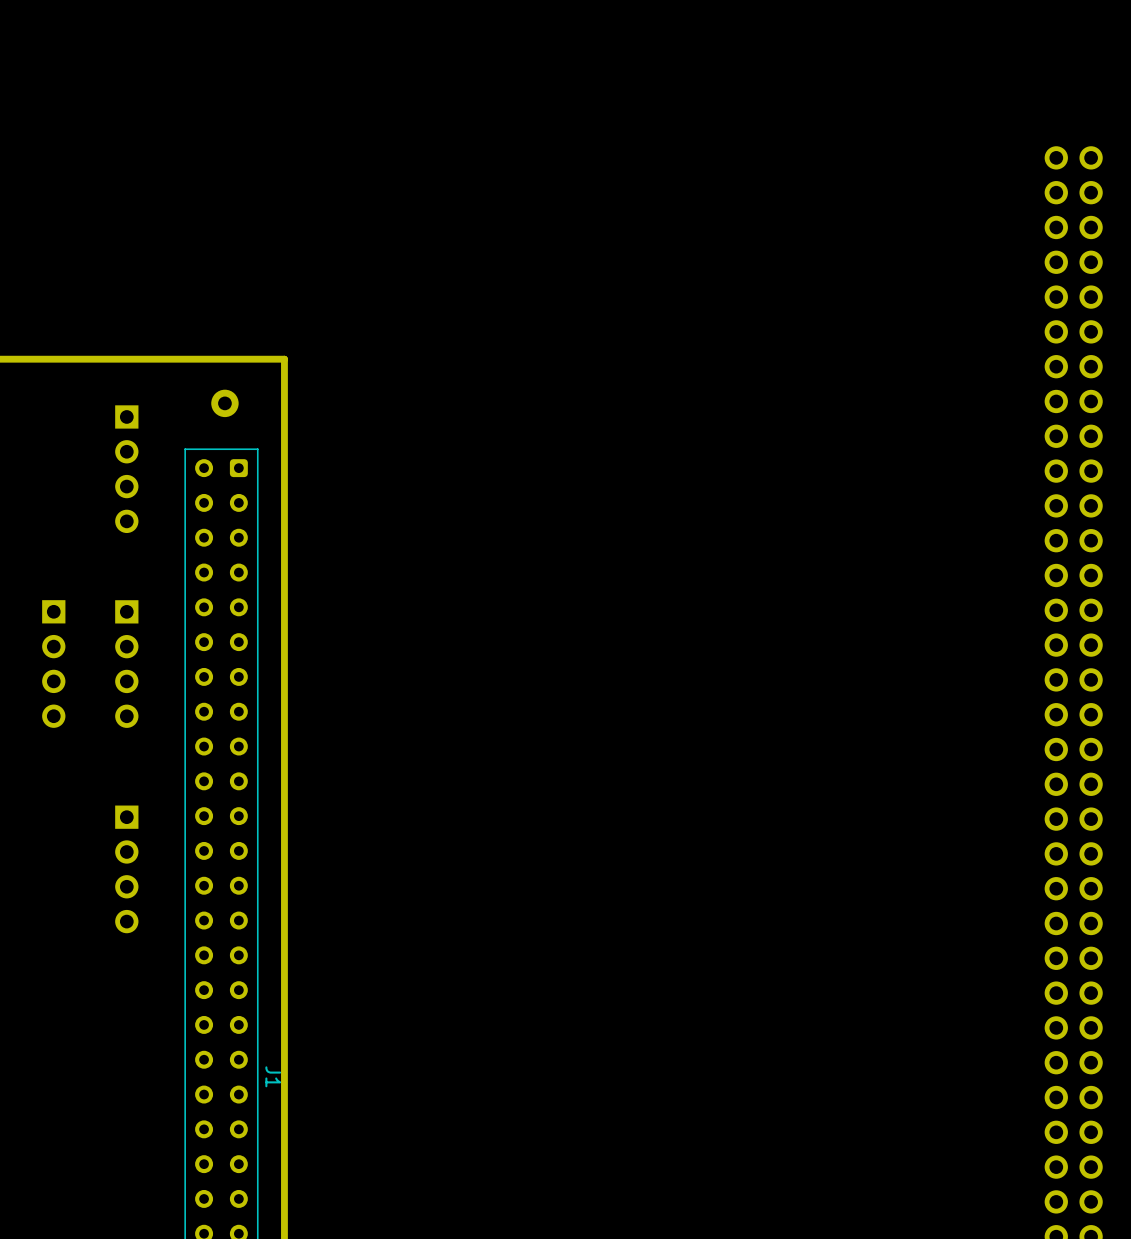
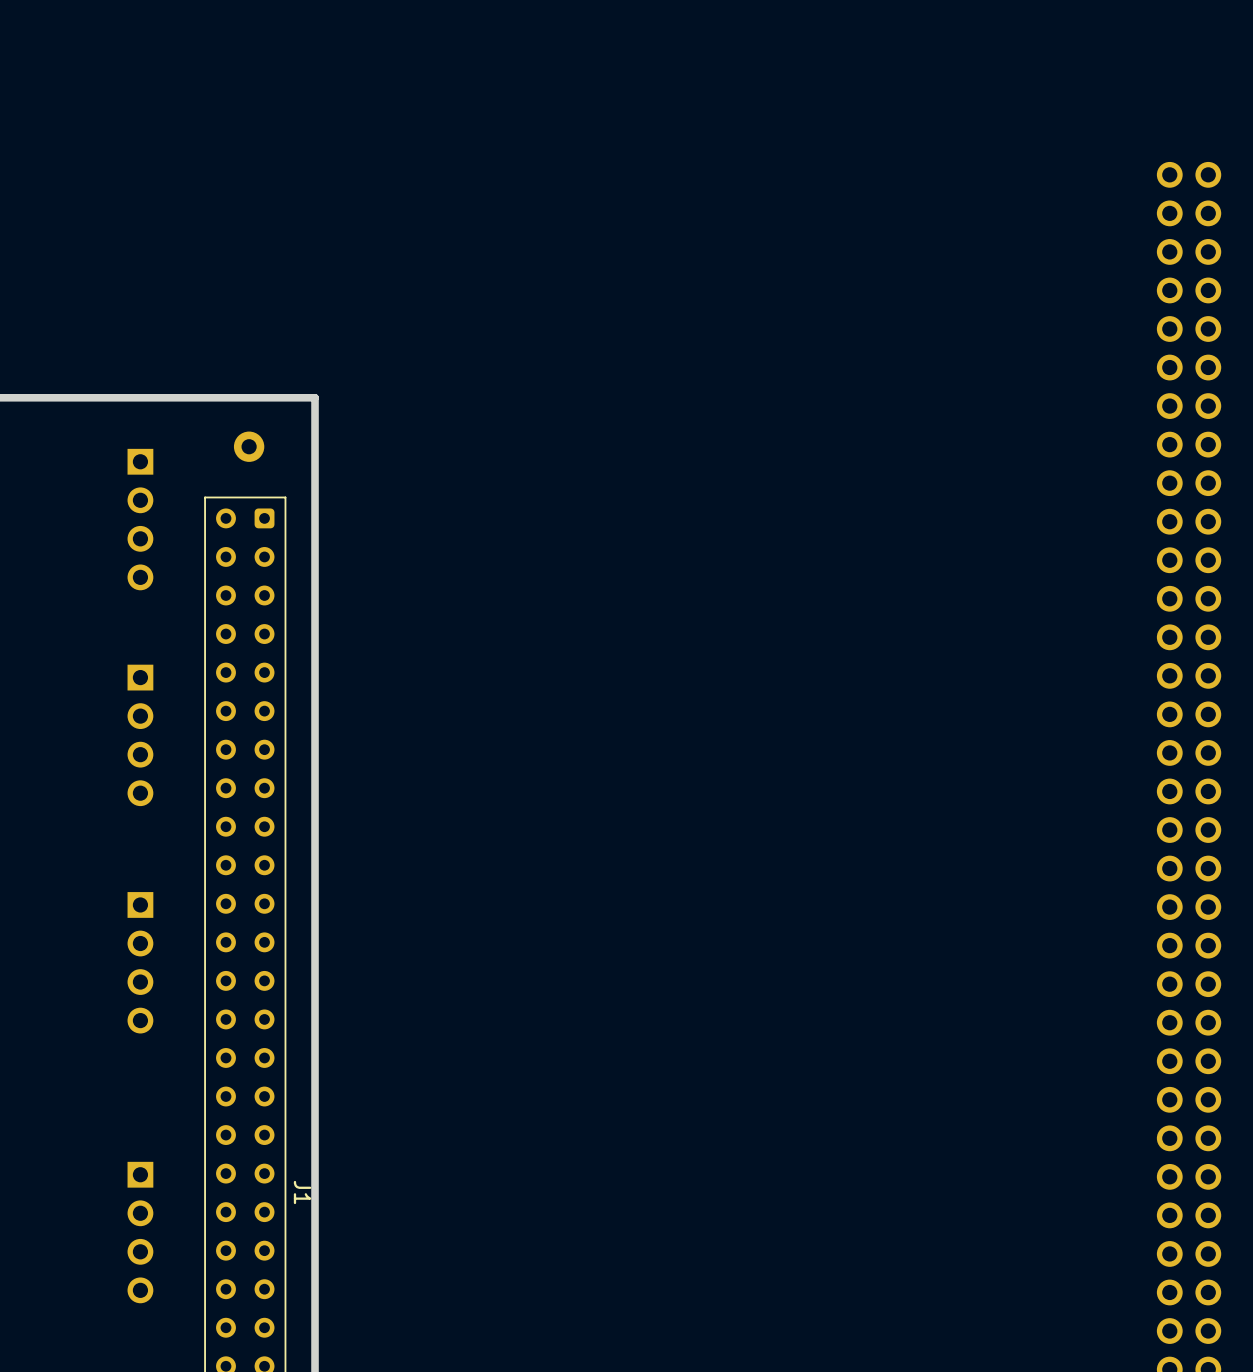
part: (53, 664) -> none
part: none -> (140, 1232)

